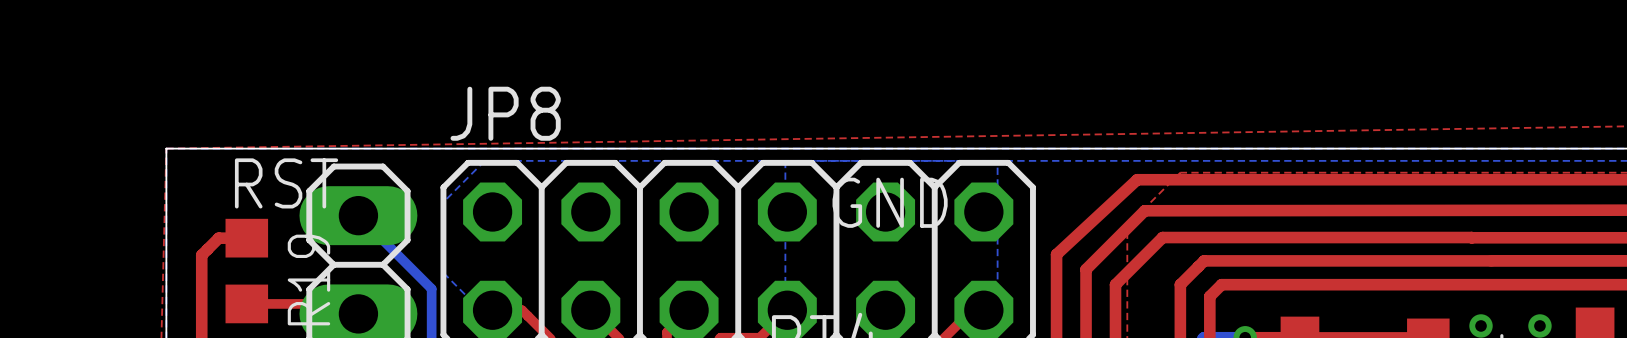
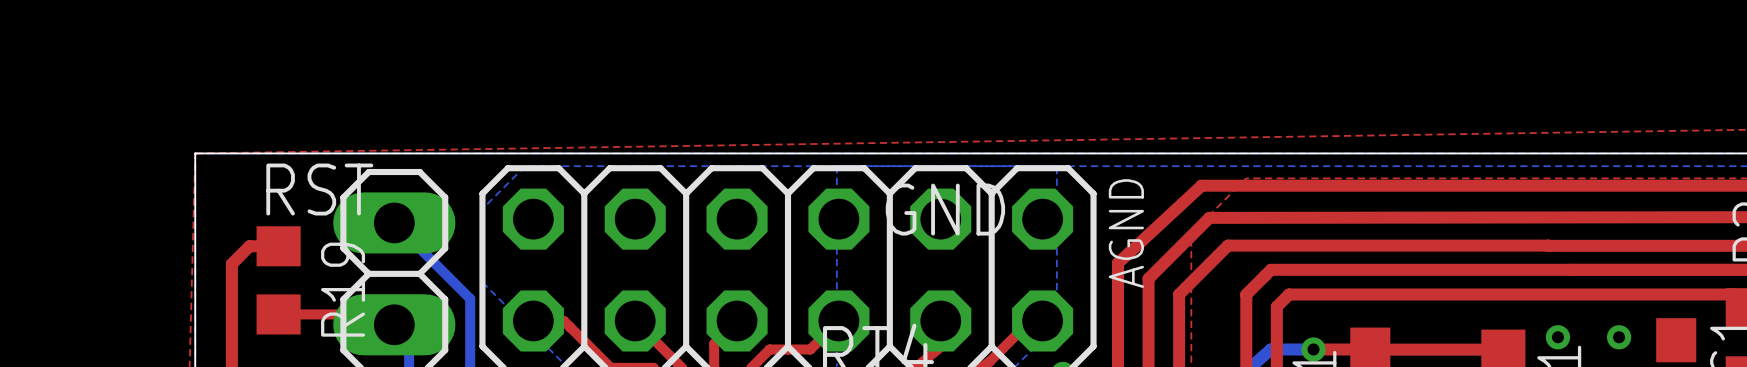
JP8 name: JP8 (505, 113) -> none
text: none -> AGND (1126, 233)

